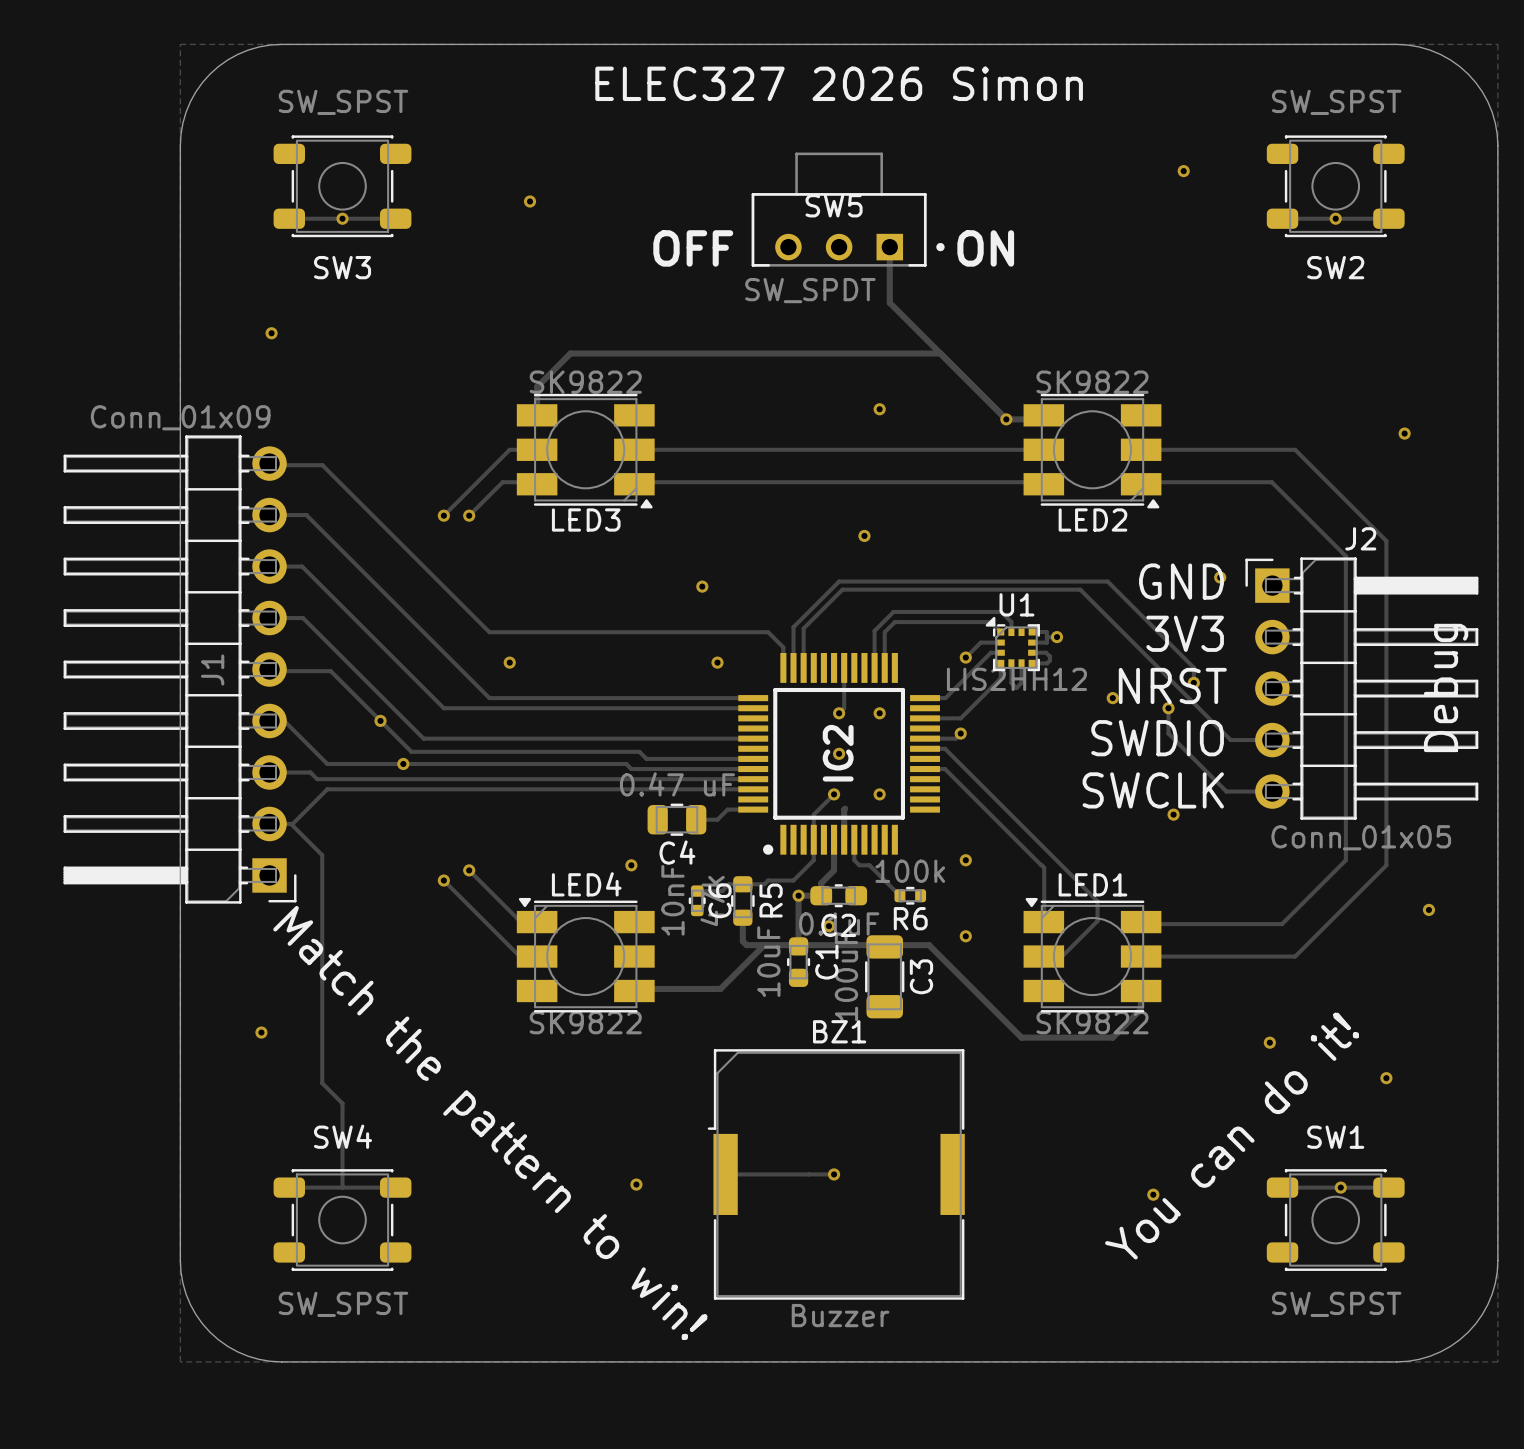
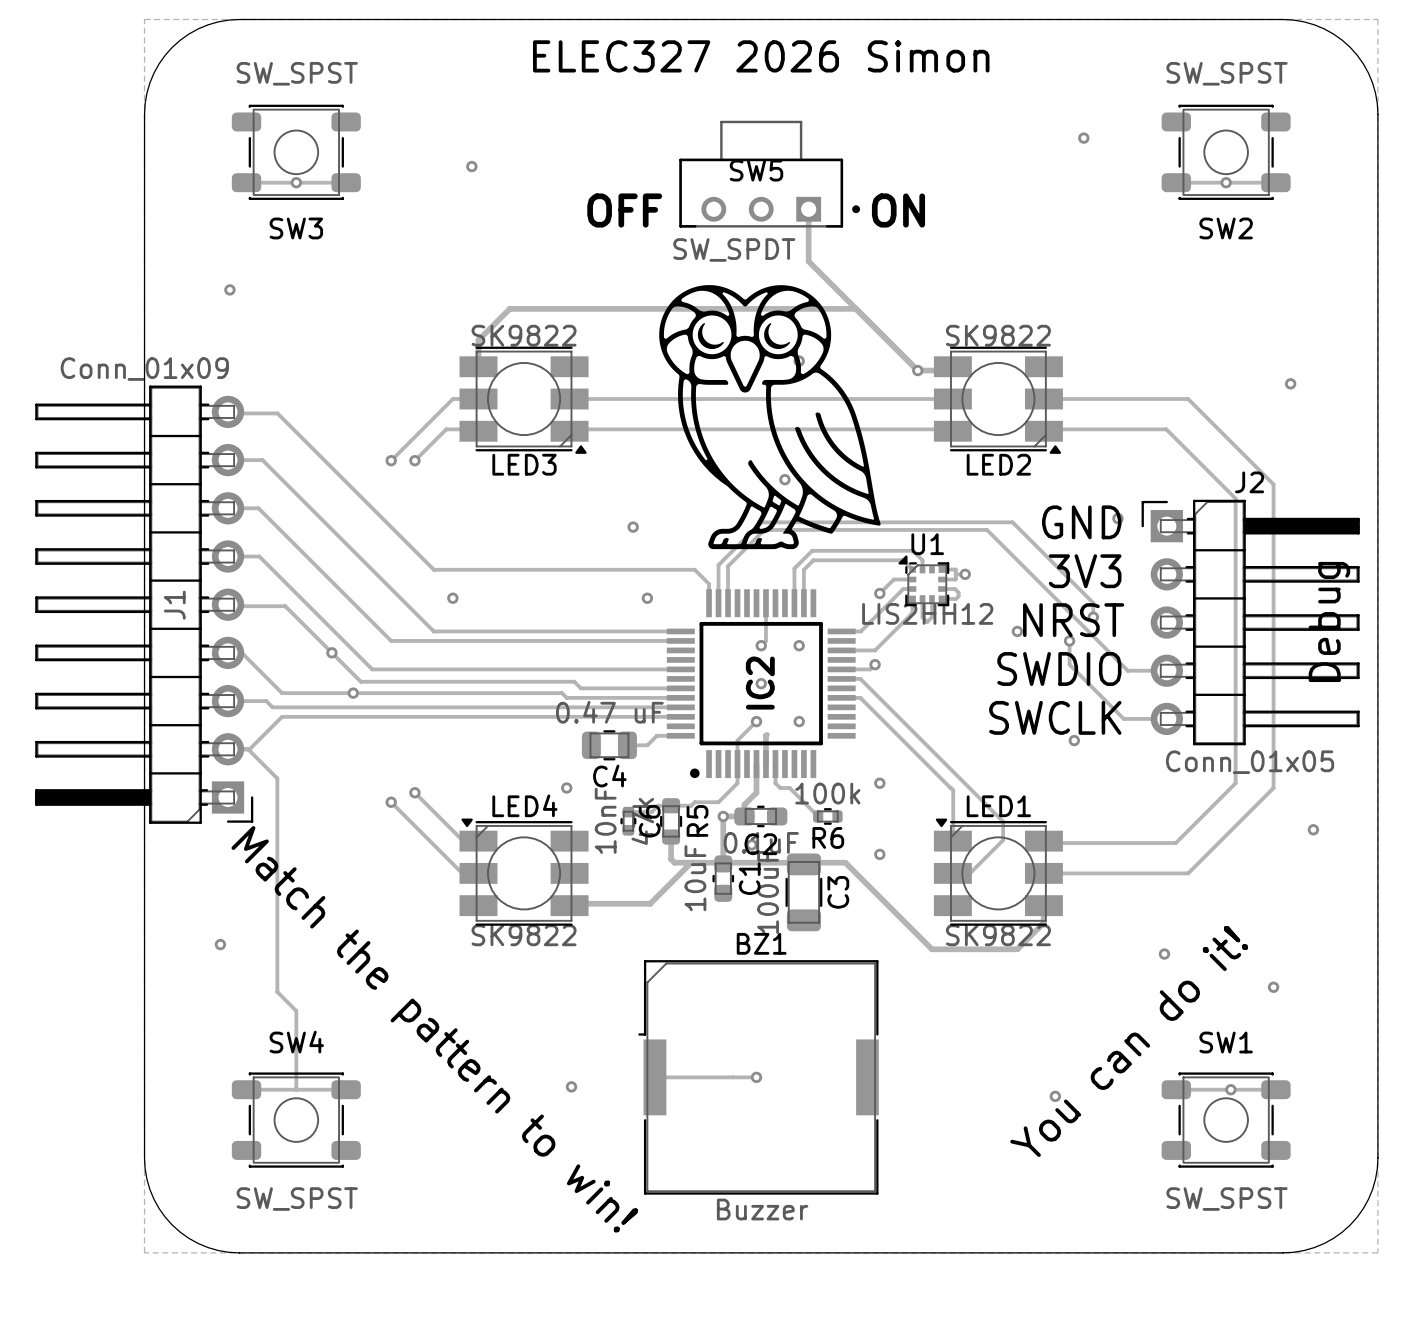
drawing: none -> [659, 285, 881, 550]

